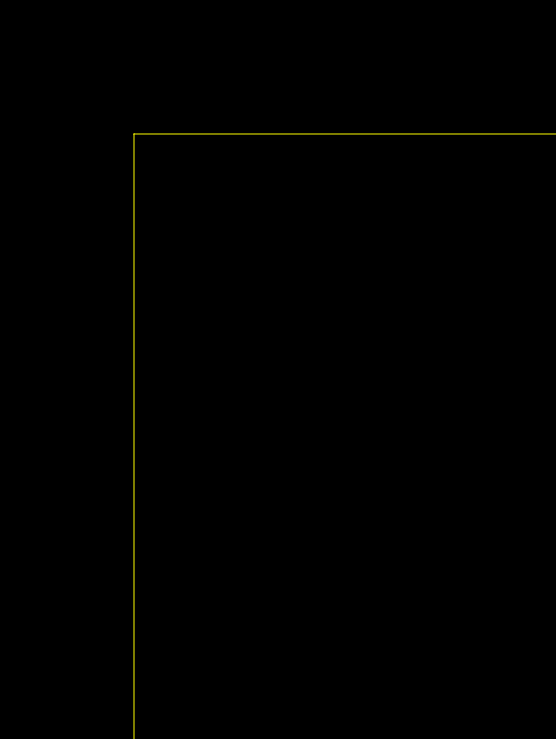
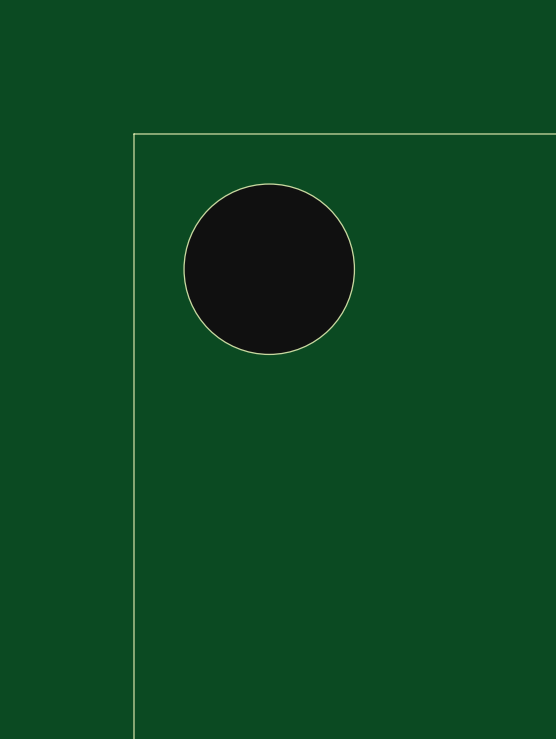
hole: none -> (269, 269)

